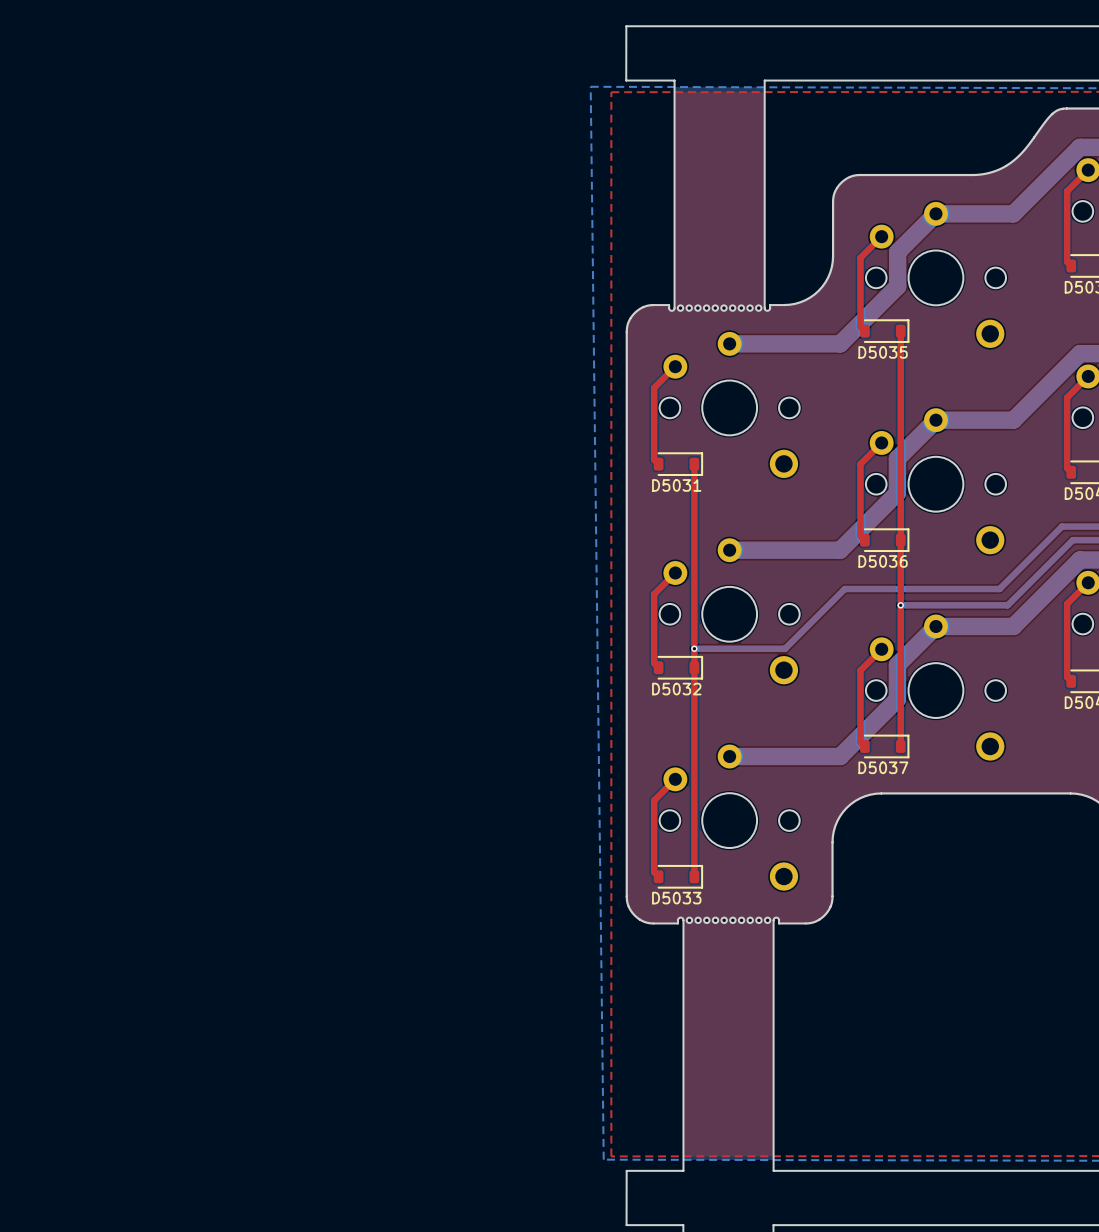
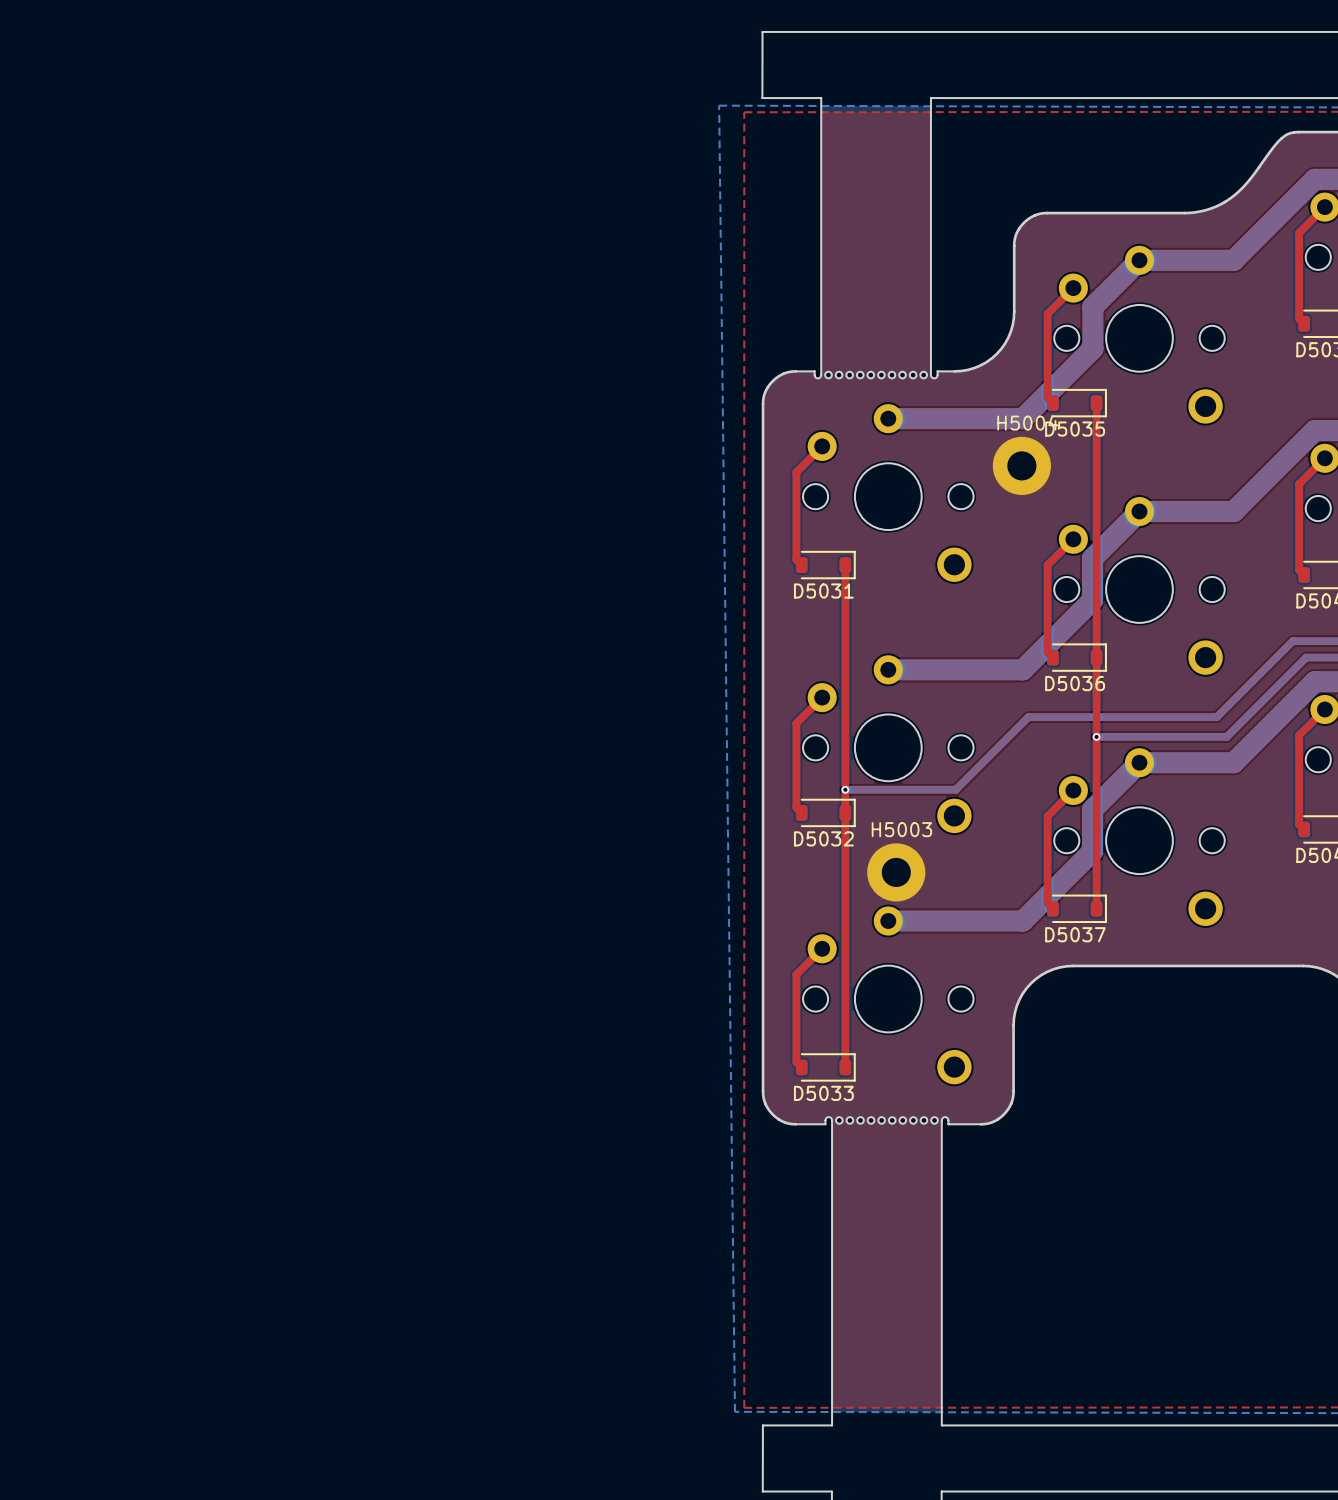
H5004: none -> (1021, 465)
H5003: none -> (896, 872)

